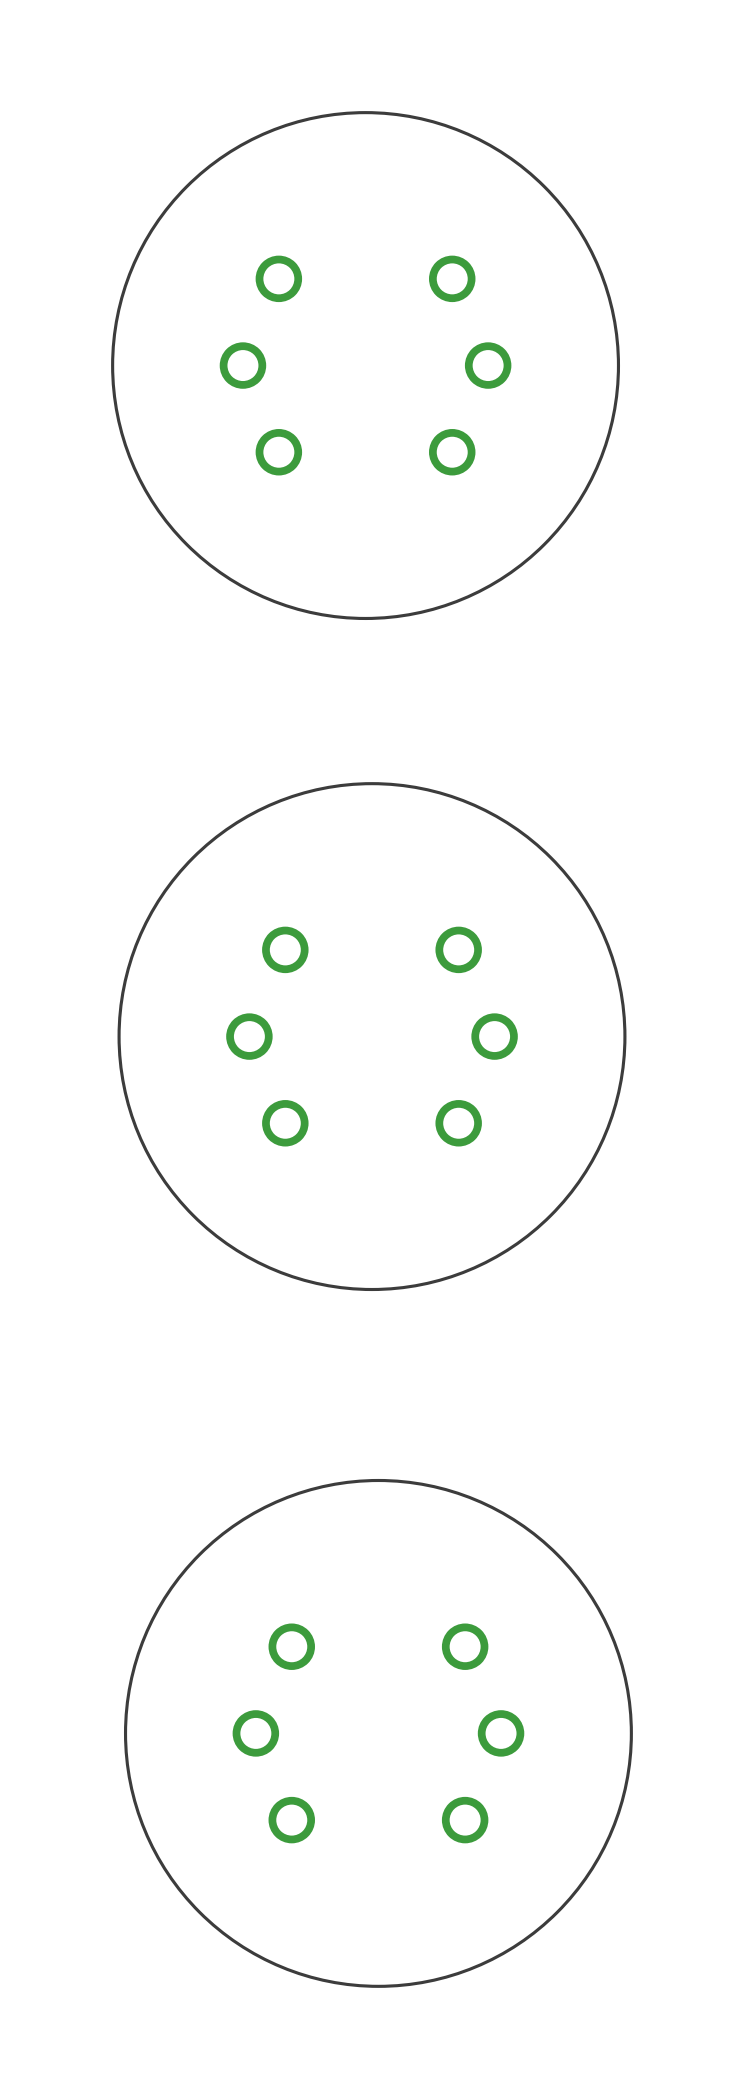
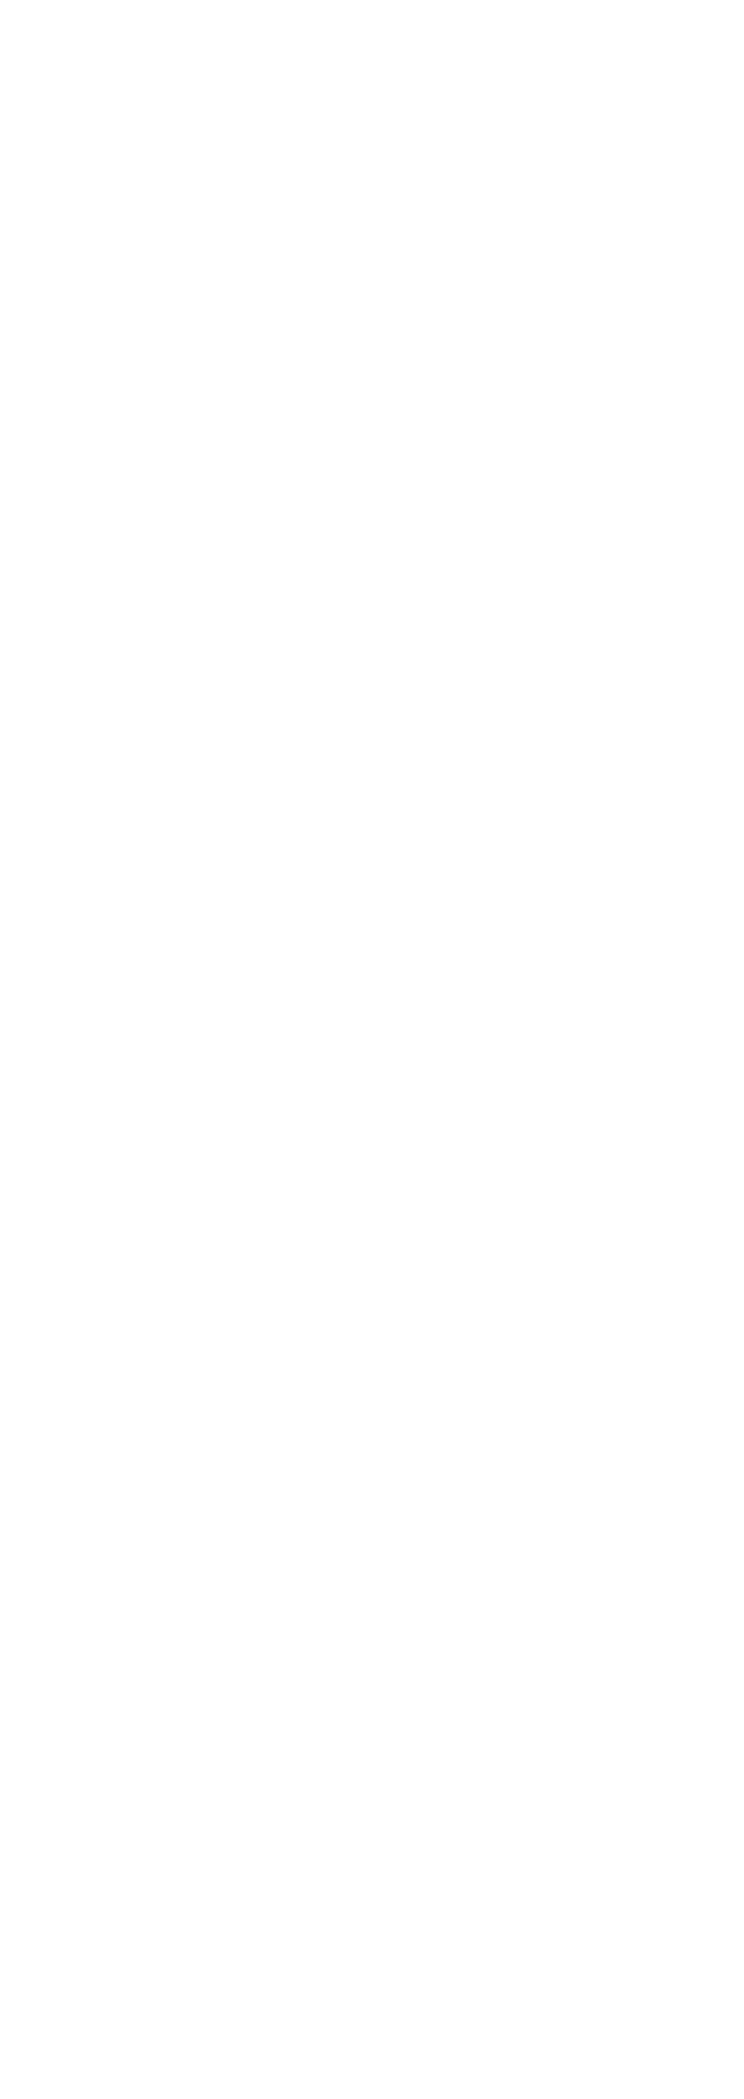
part: (365, 365) -> none
part: (372, 1036) -> none
part: (378, 1733) -> none

